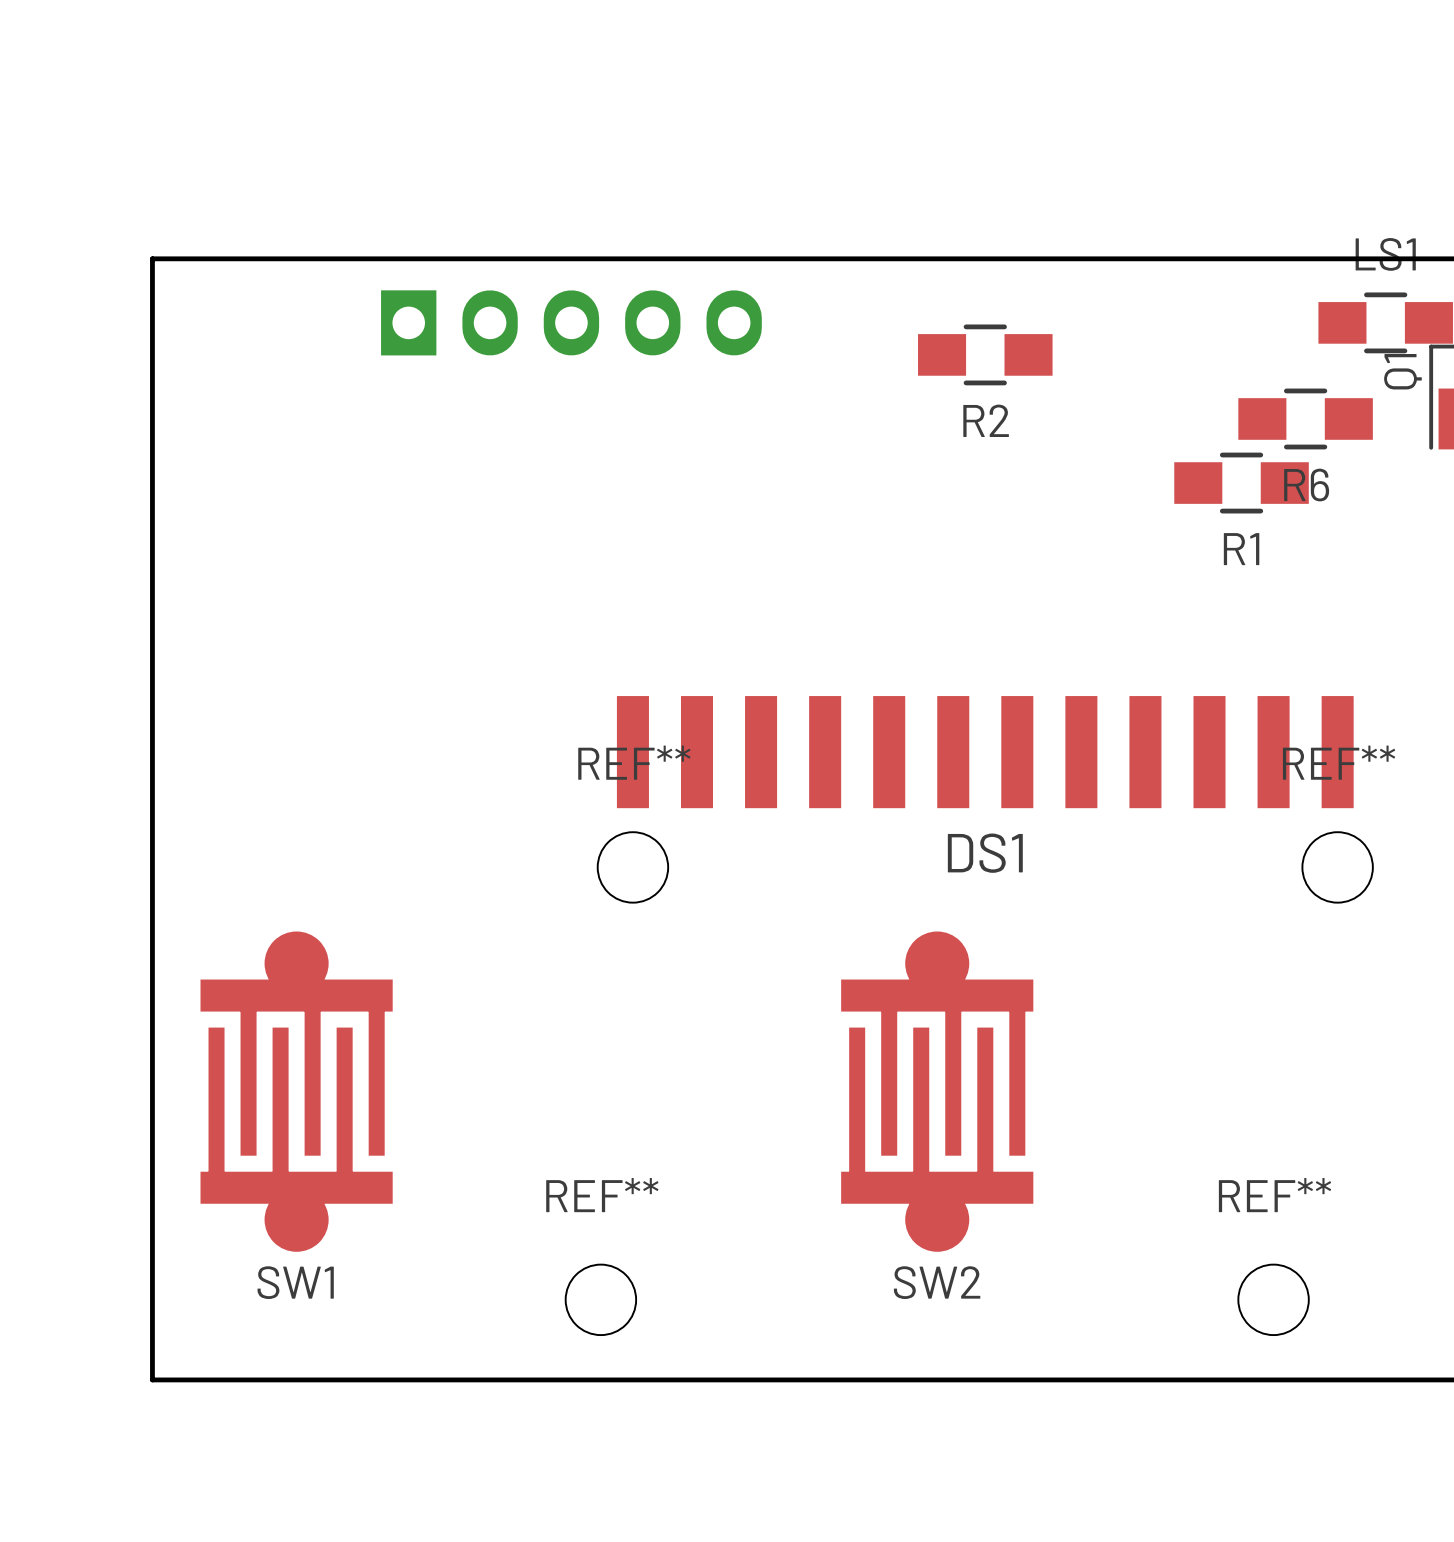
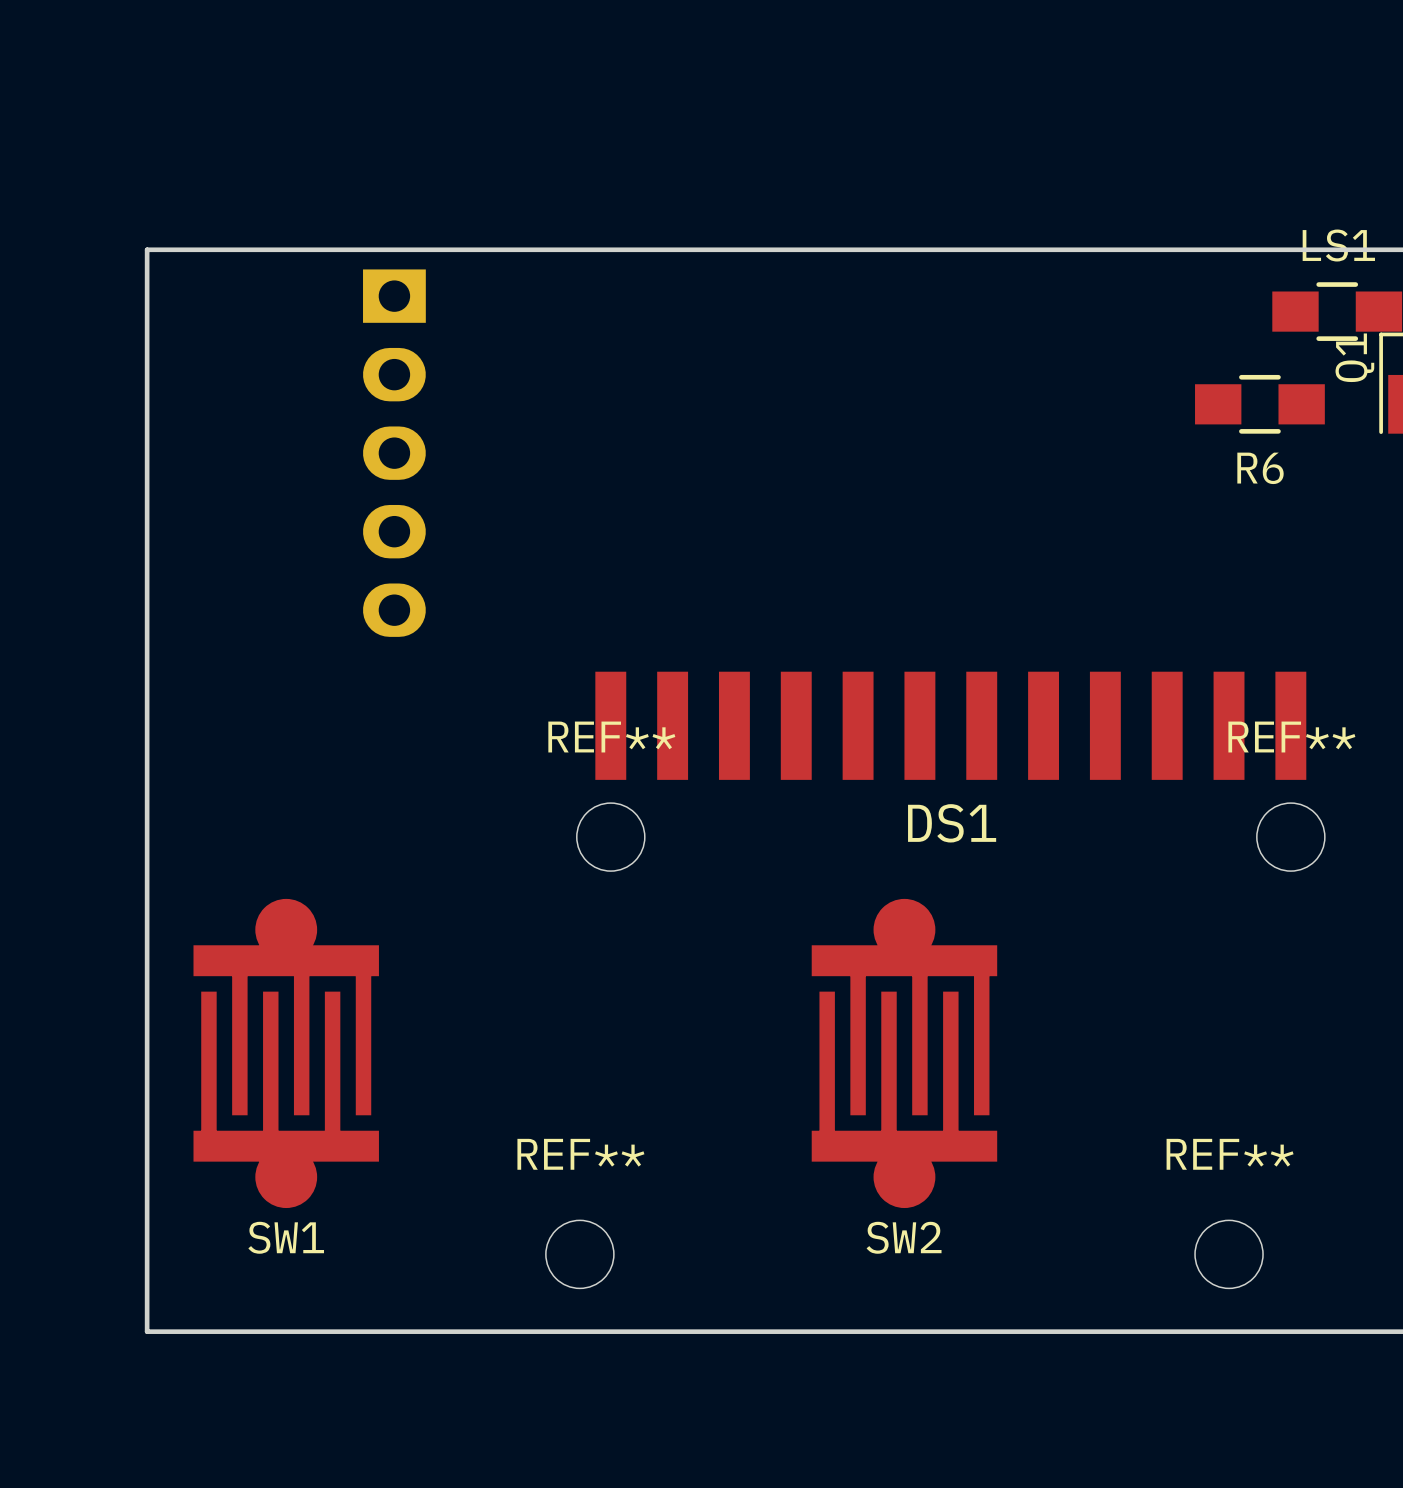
part rotation: 0° (571, 322) -> 90° clockwise (394, 453)
R2: (985, 354) -> none
R1: (1241, 483) -> none

